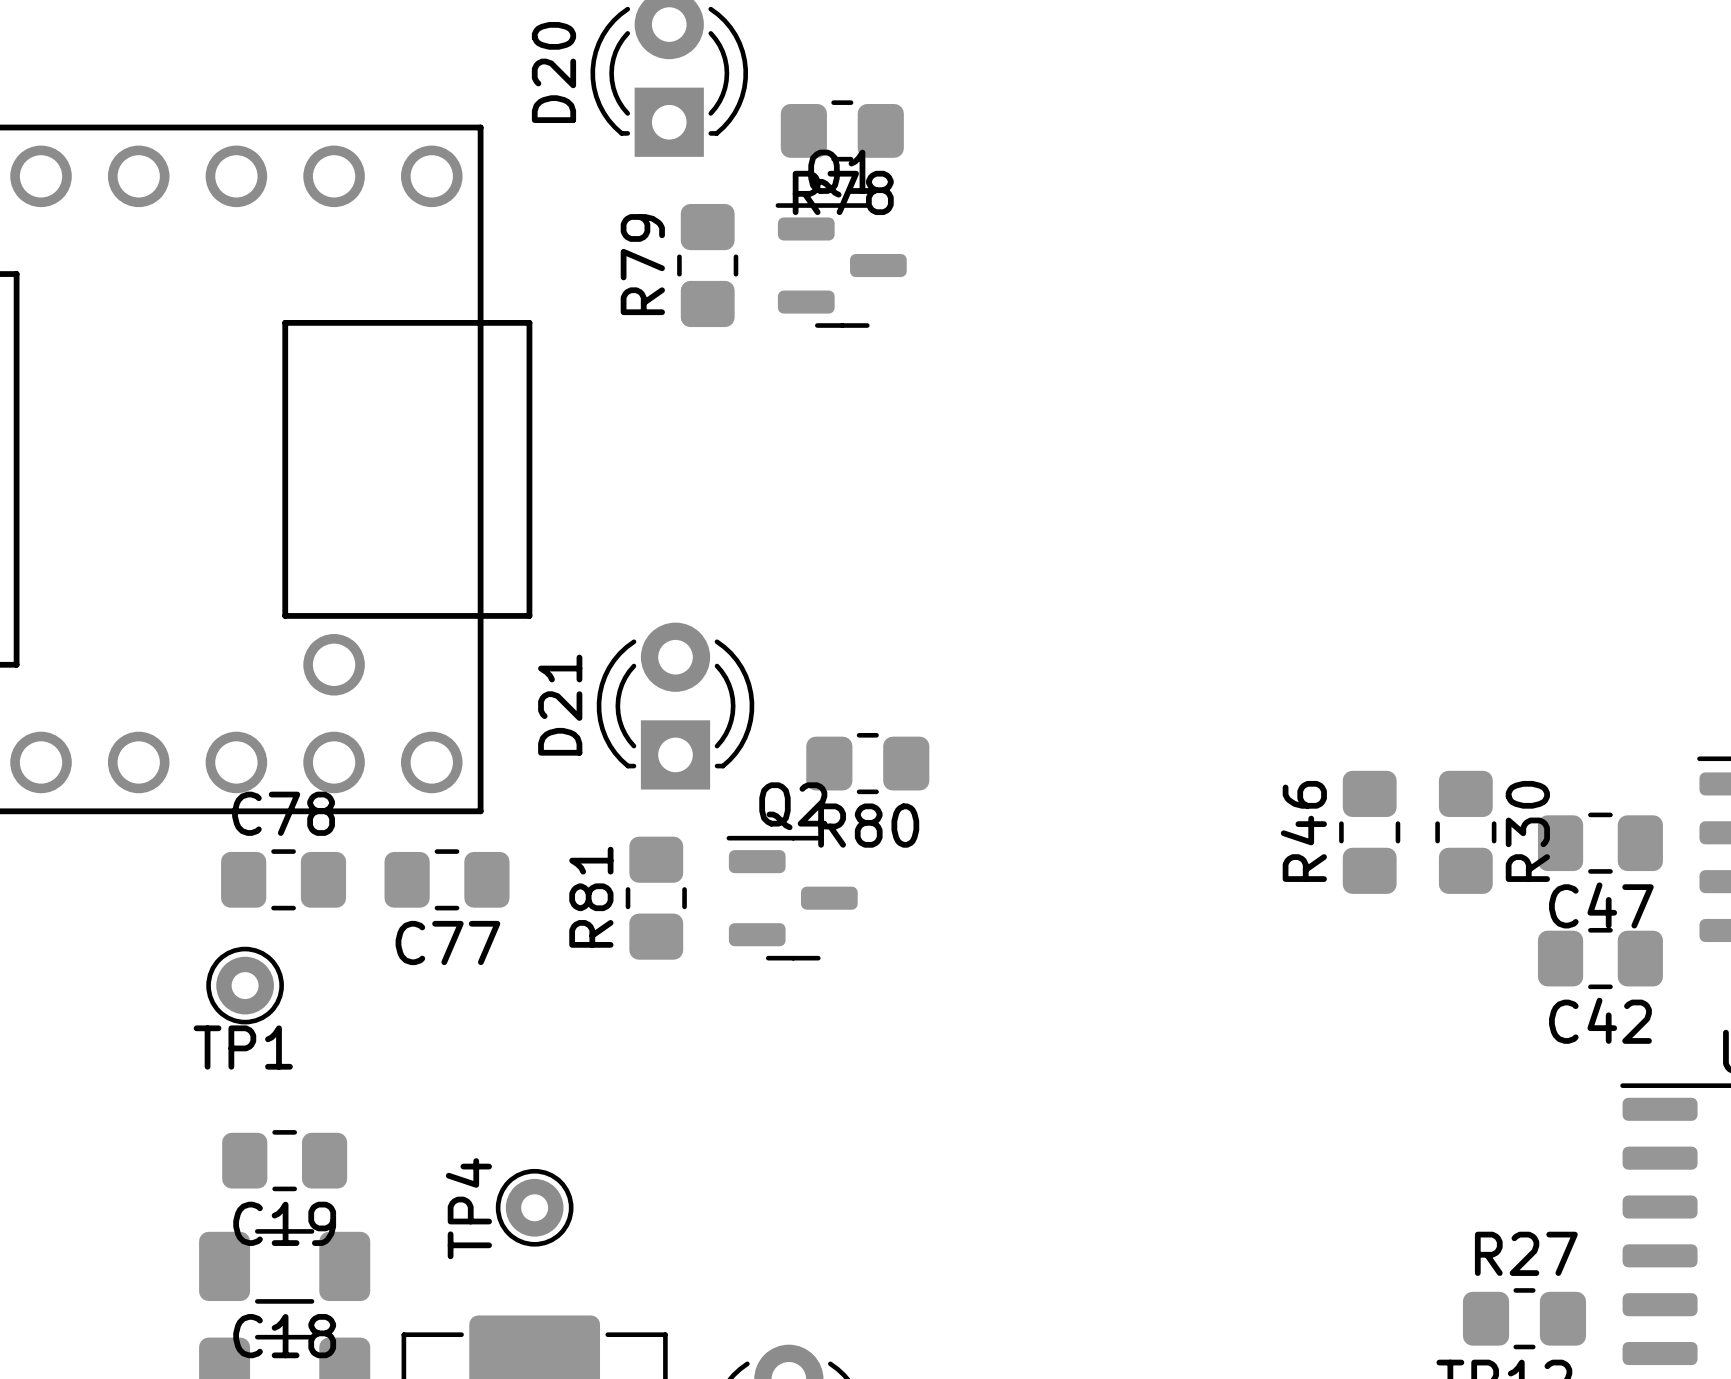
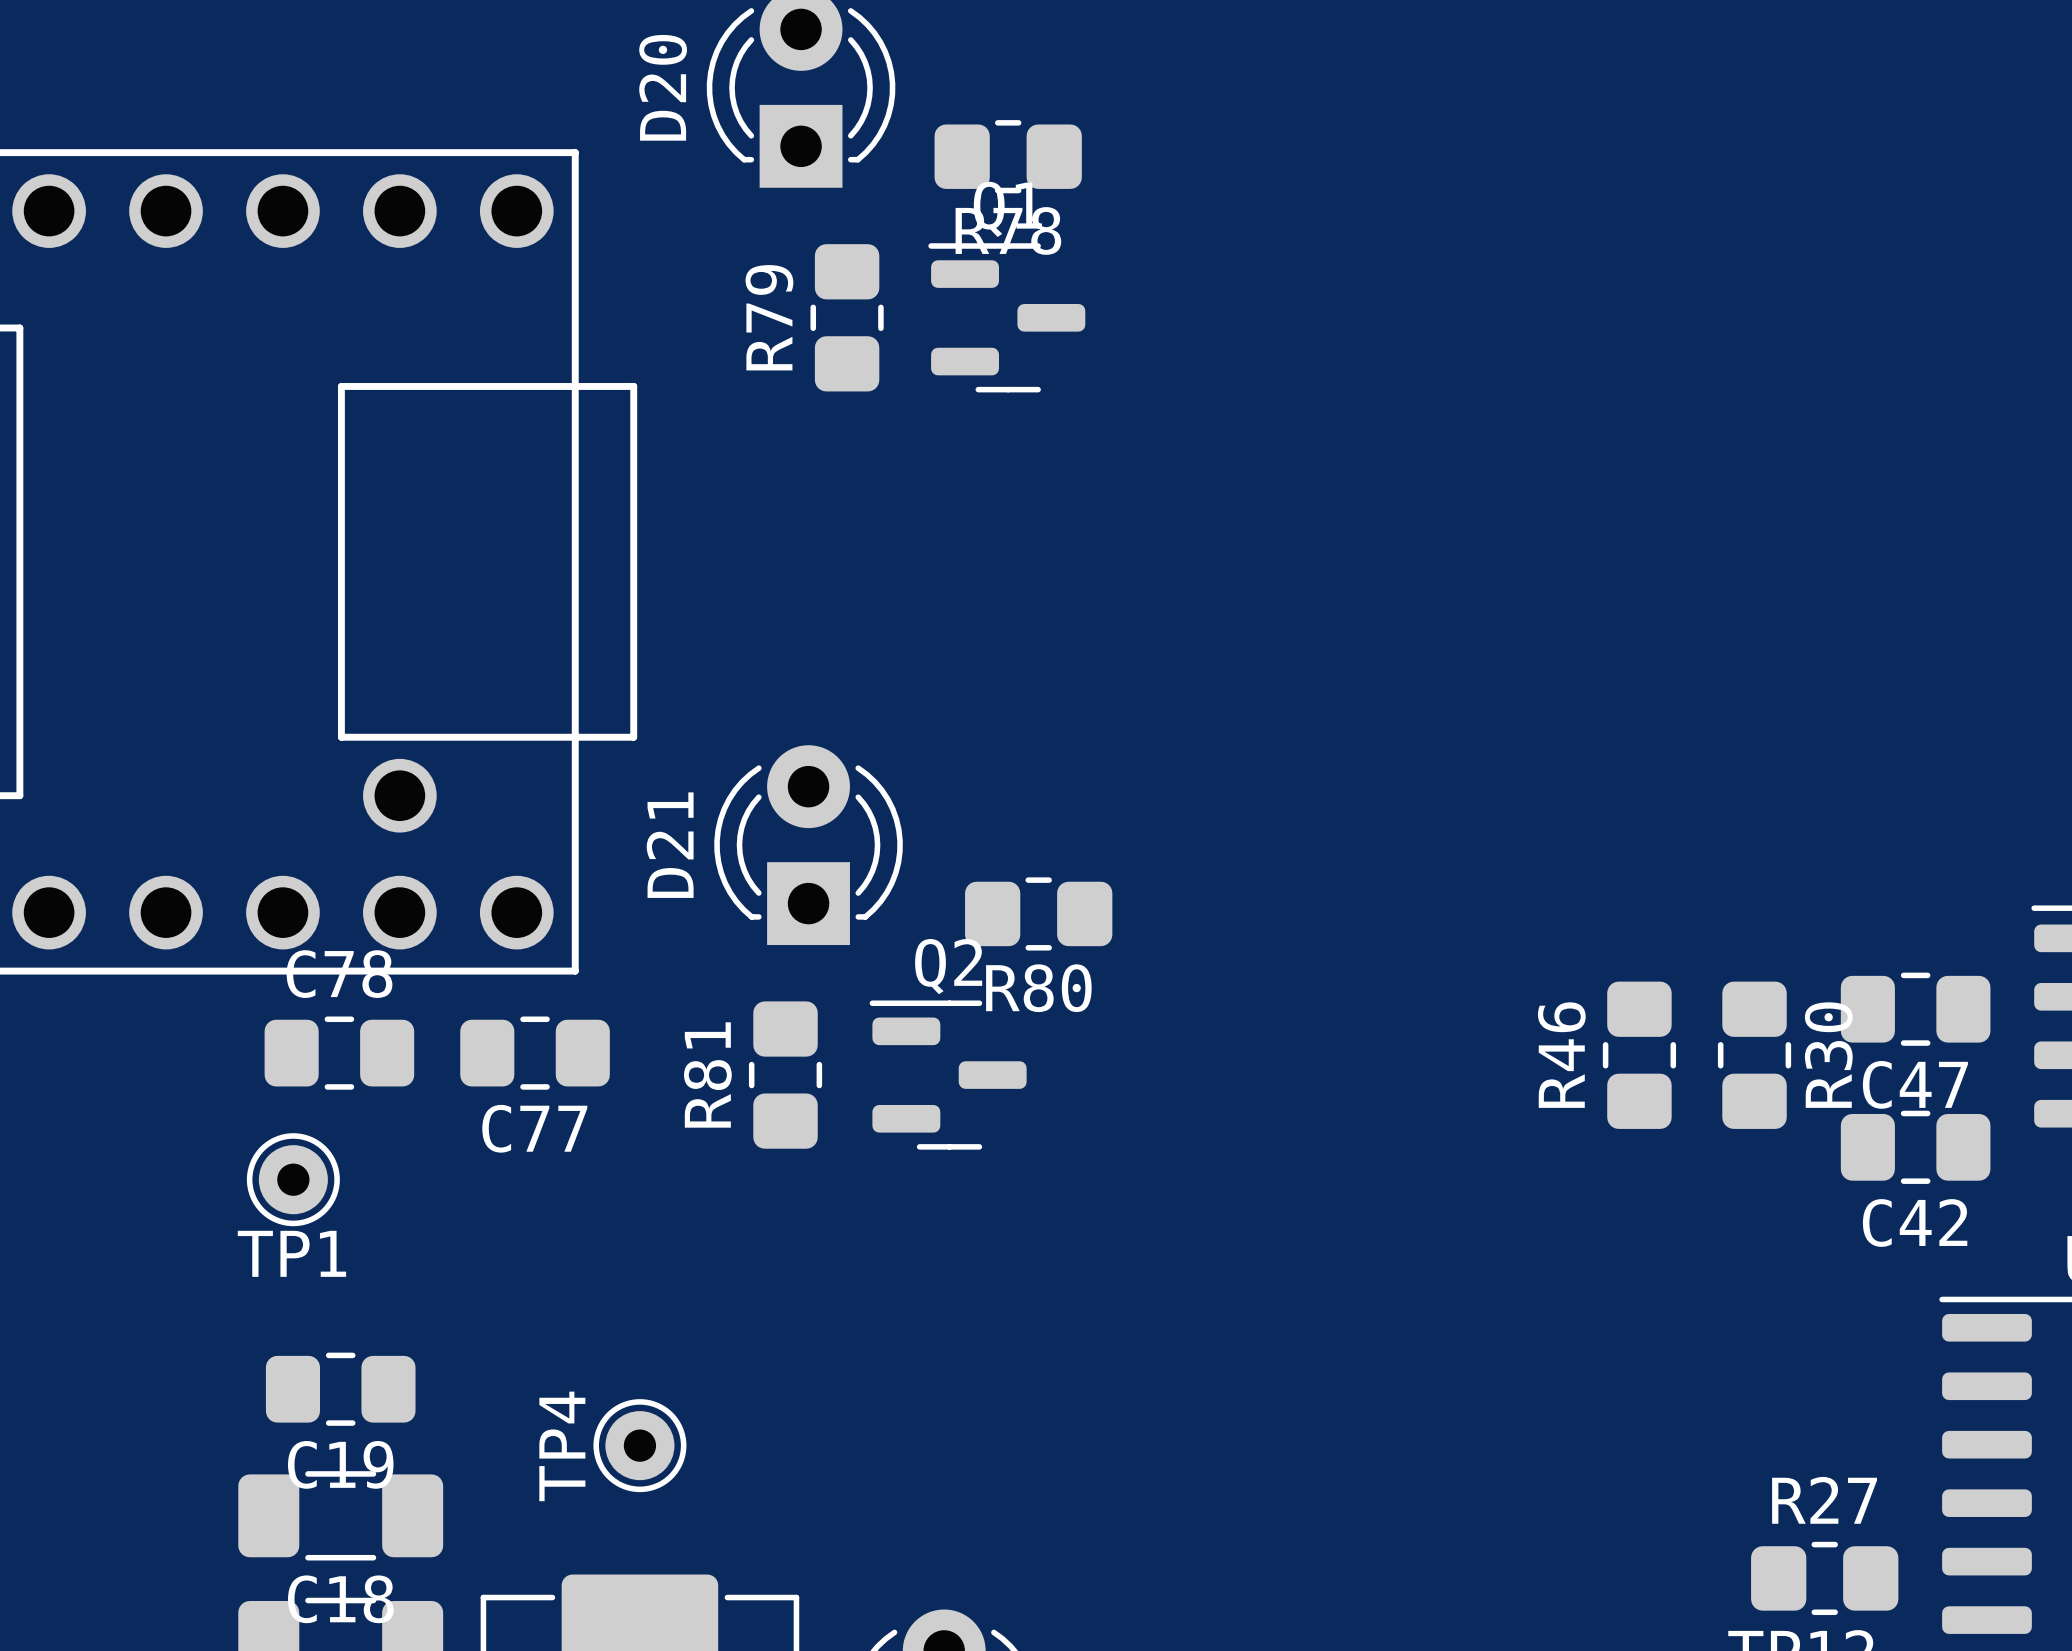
R46 position: (1369, 832) -> (1639, 1055)
R30 position: (1465, 832) -> (1754, 1055)

